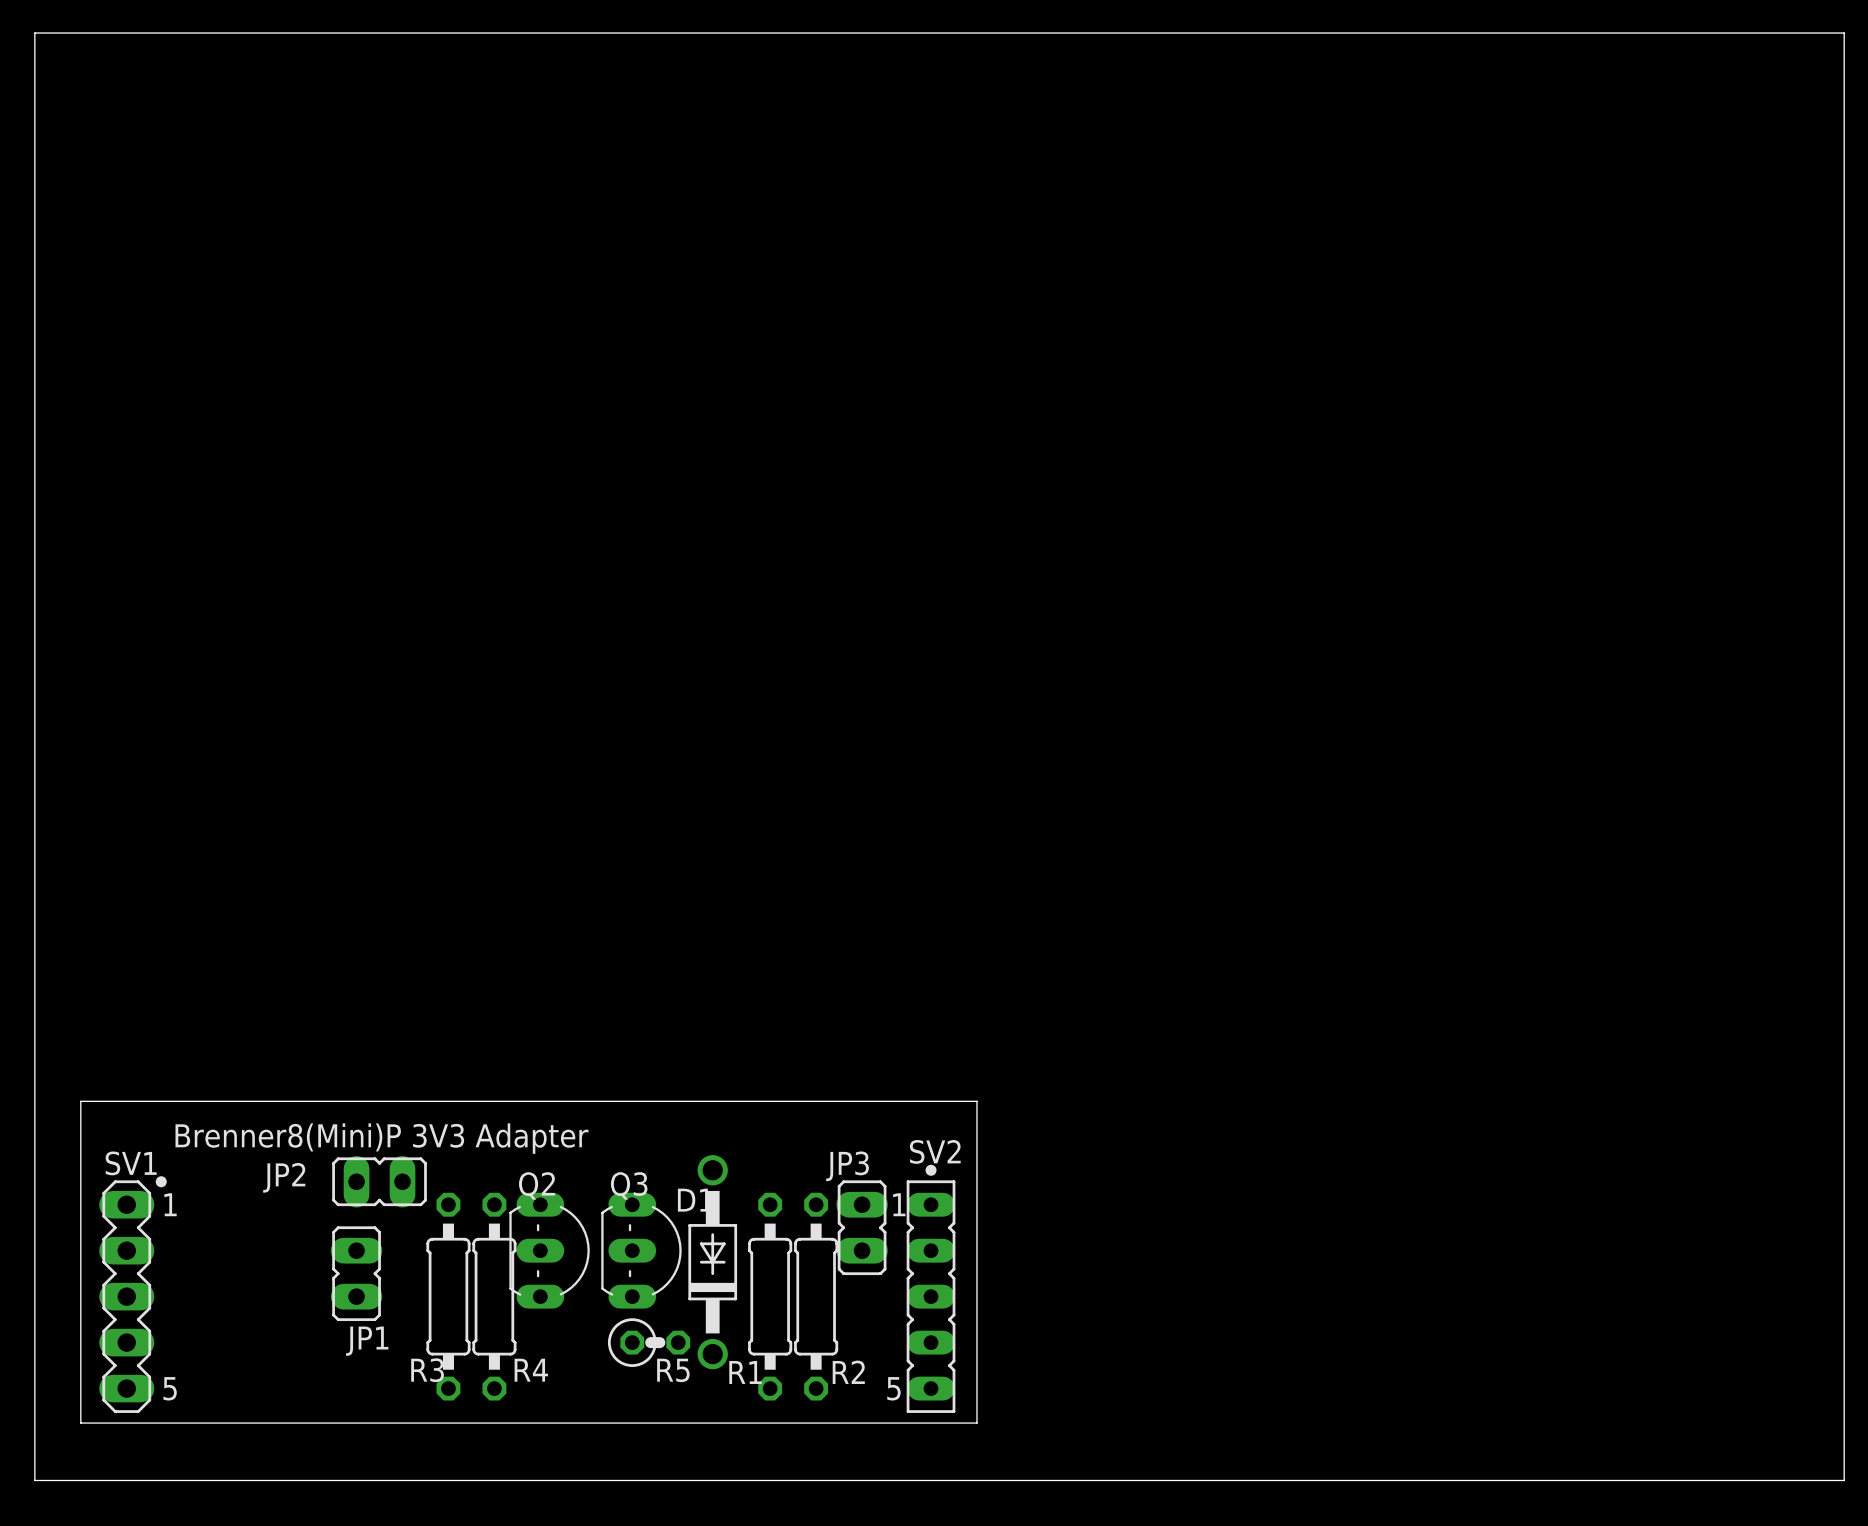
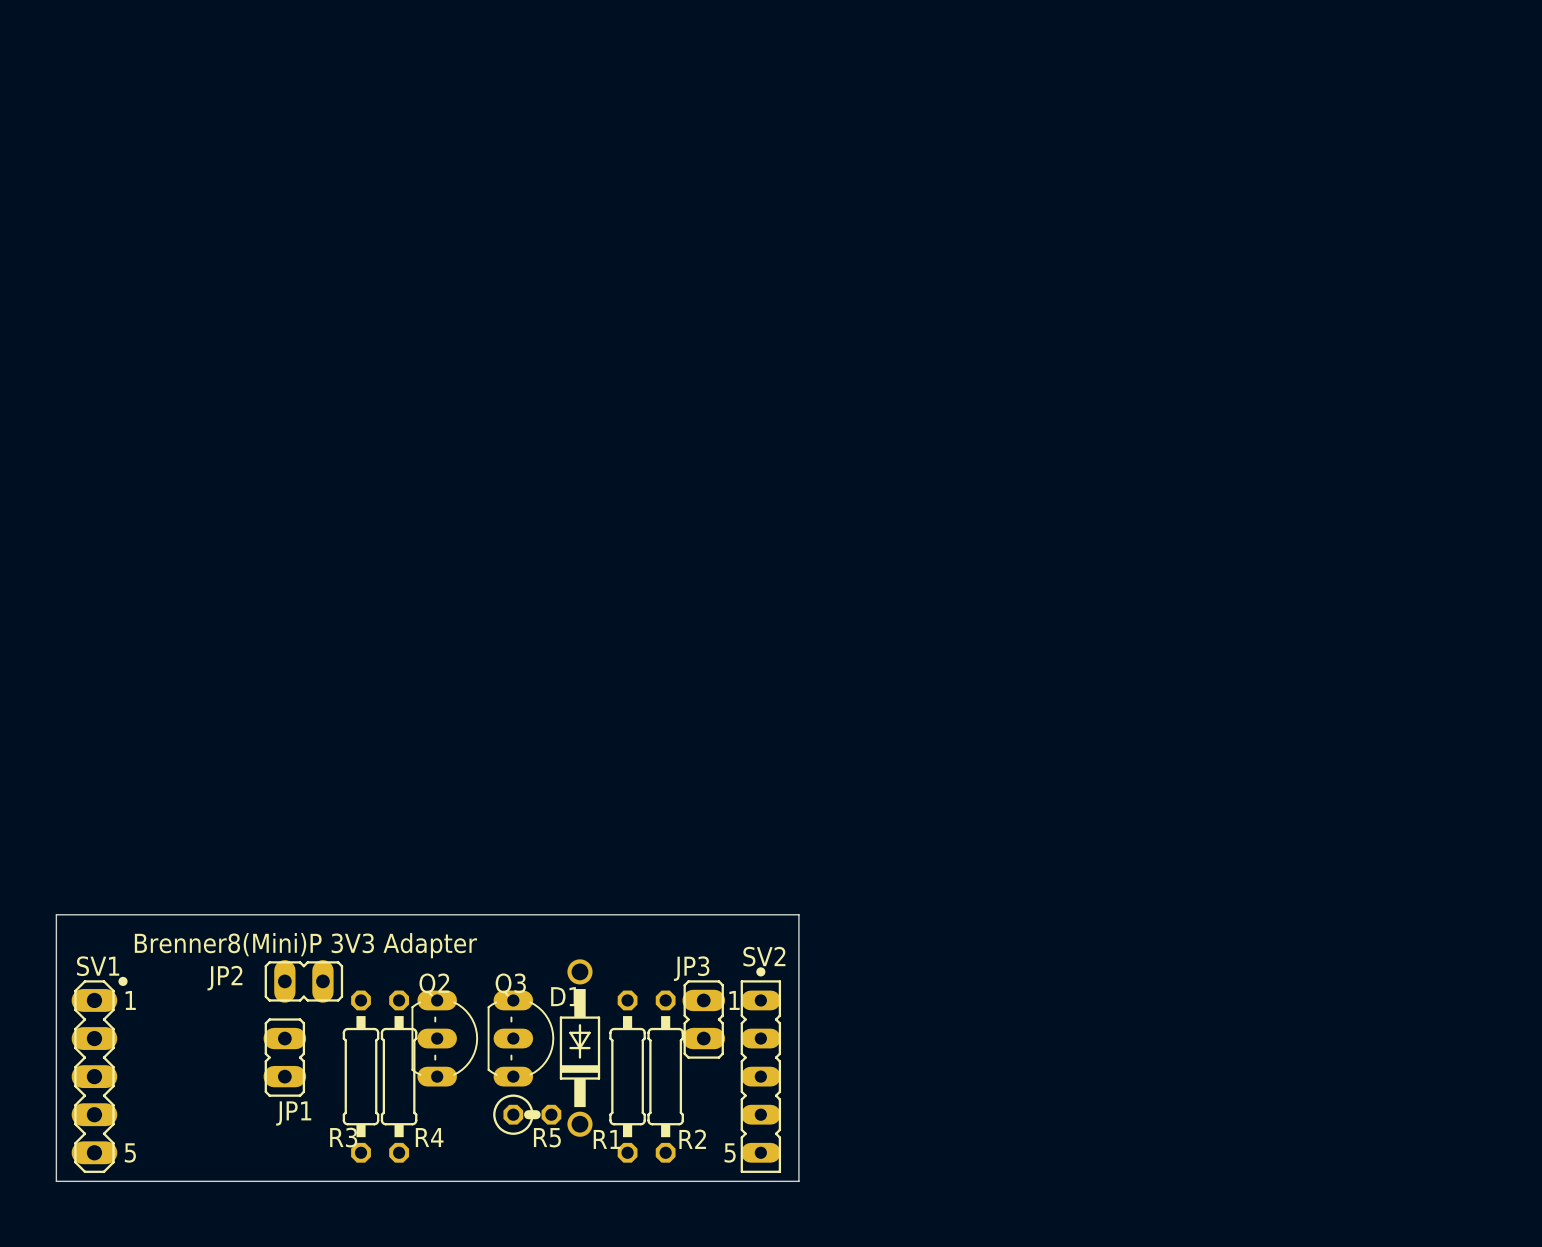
board edge: (34, 33) (1844, 33) (1844, 1480) (34, 1480) (34, 33) -> none

